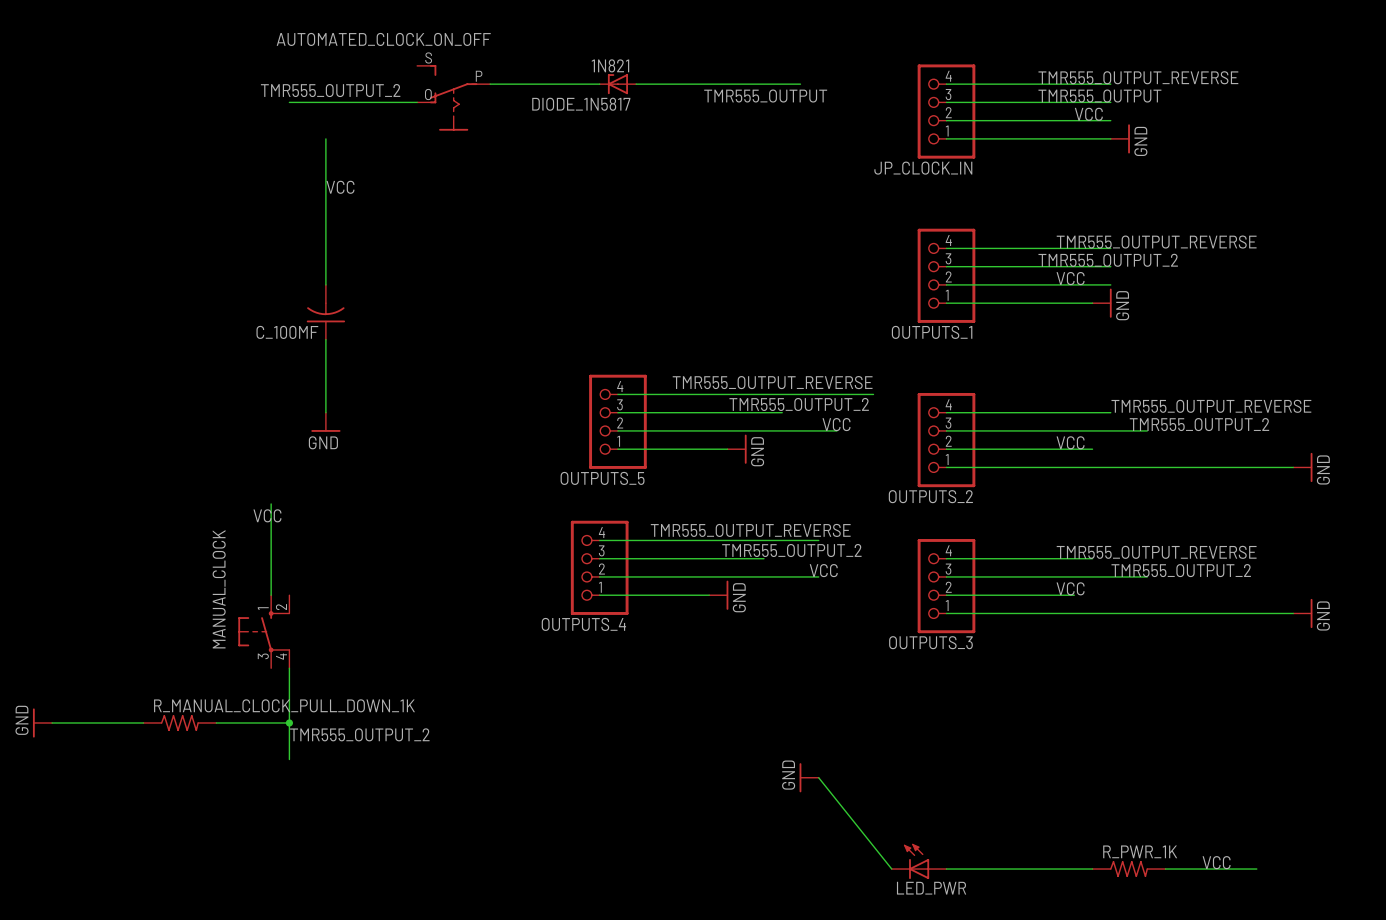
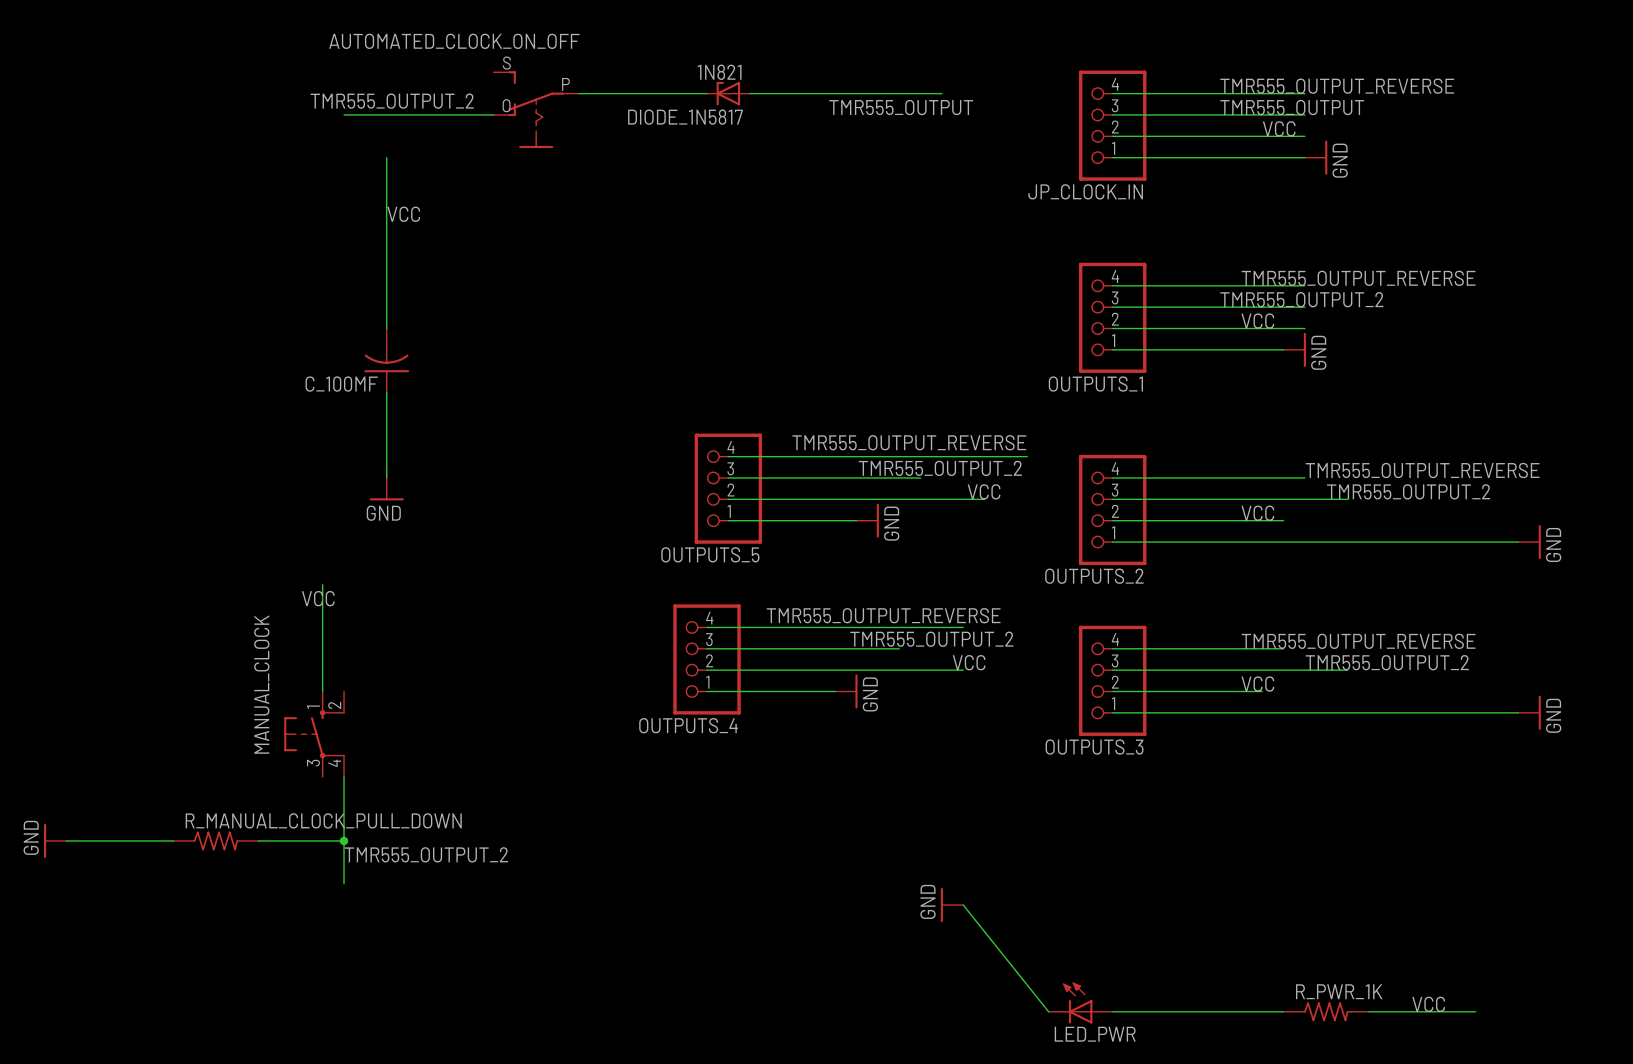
R_MANUAL_CLOCK_PULL_DOWN_1K name: R_MANUAL_CLOCK_PULL_DOWN_1K (284, 705) -> R_MANUAL_CLOCK_PULL_DOWN (323, 820)

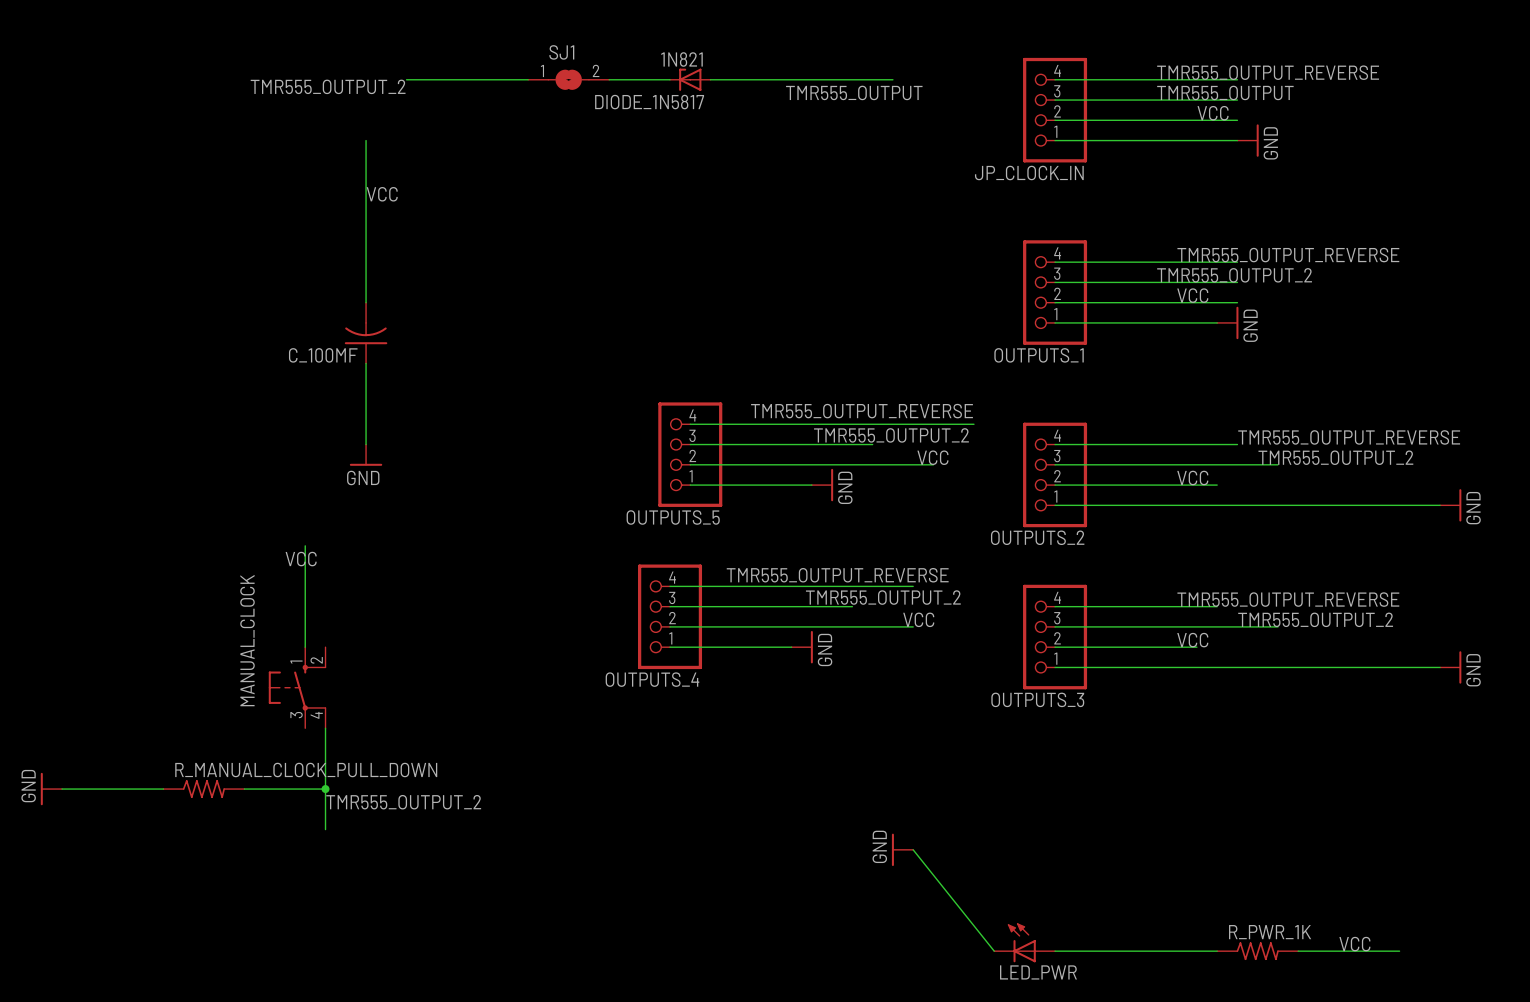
wire: none -> (406, 79) (528, 79)
SJ1: none -> (568, 79)
label position: TMR555_OUTPUT_2 (392, 101) -> TMR555_OUTPUT_2 (328, 86)
AUTOMATED_CLOCK_ON_OFF: (536, 109) -> none
wire: (344, 114) (493, 114) -> none

